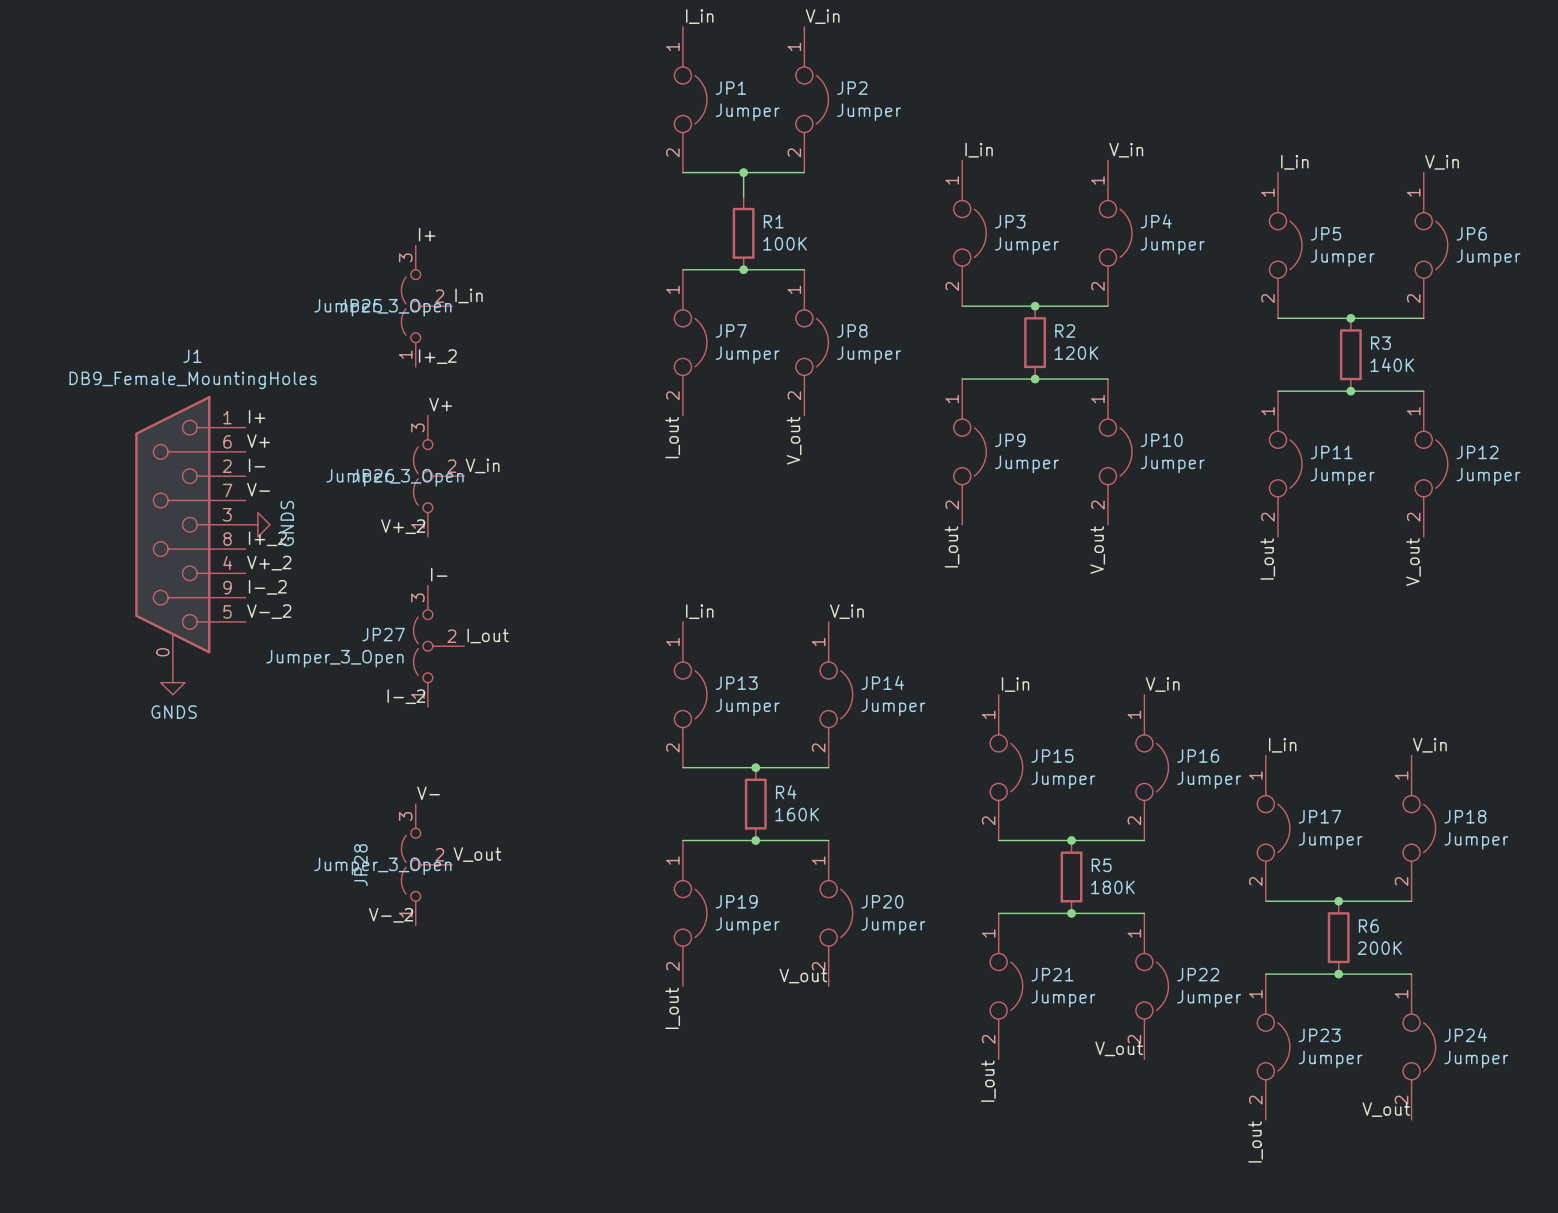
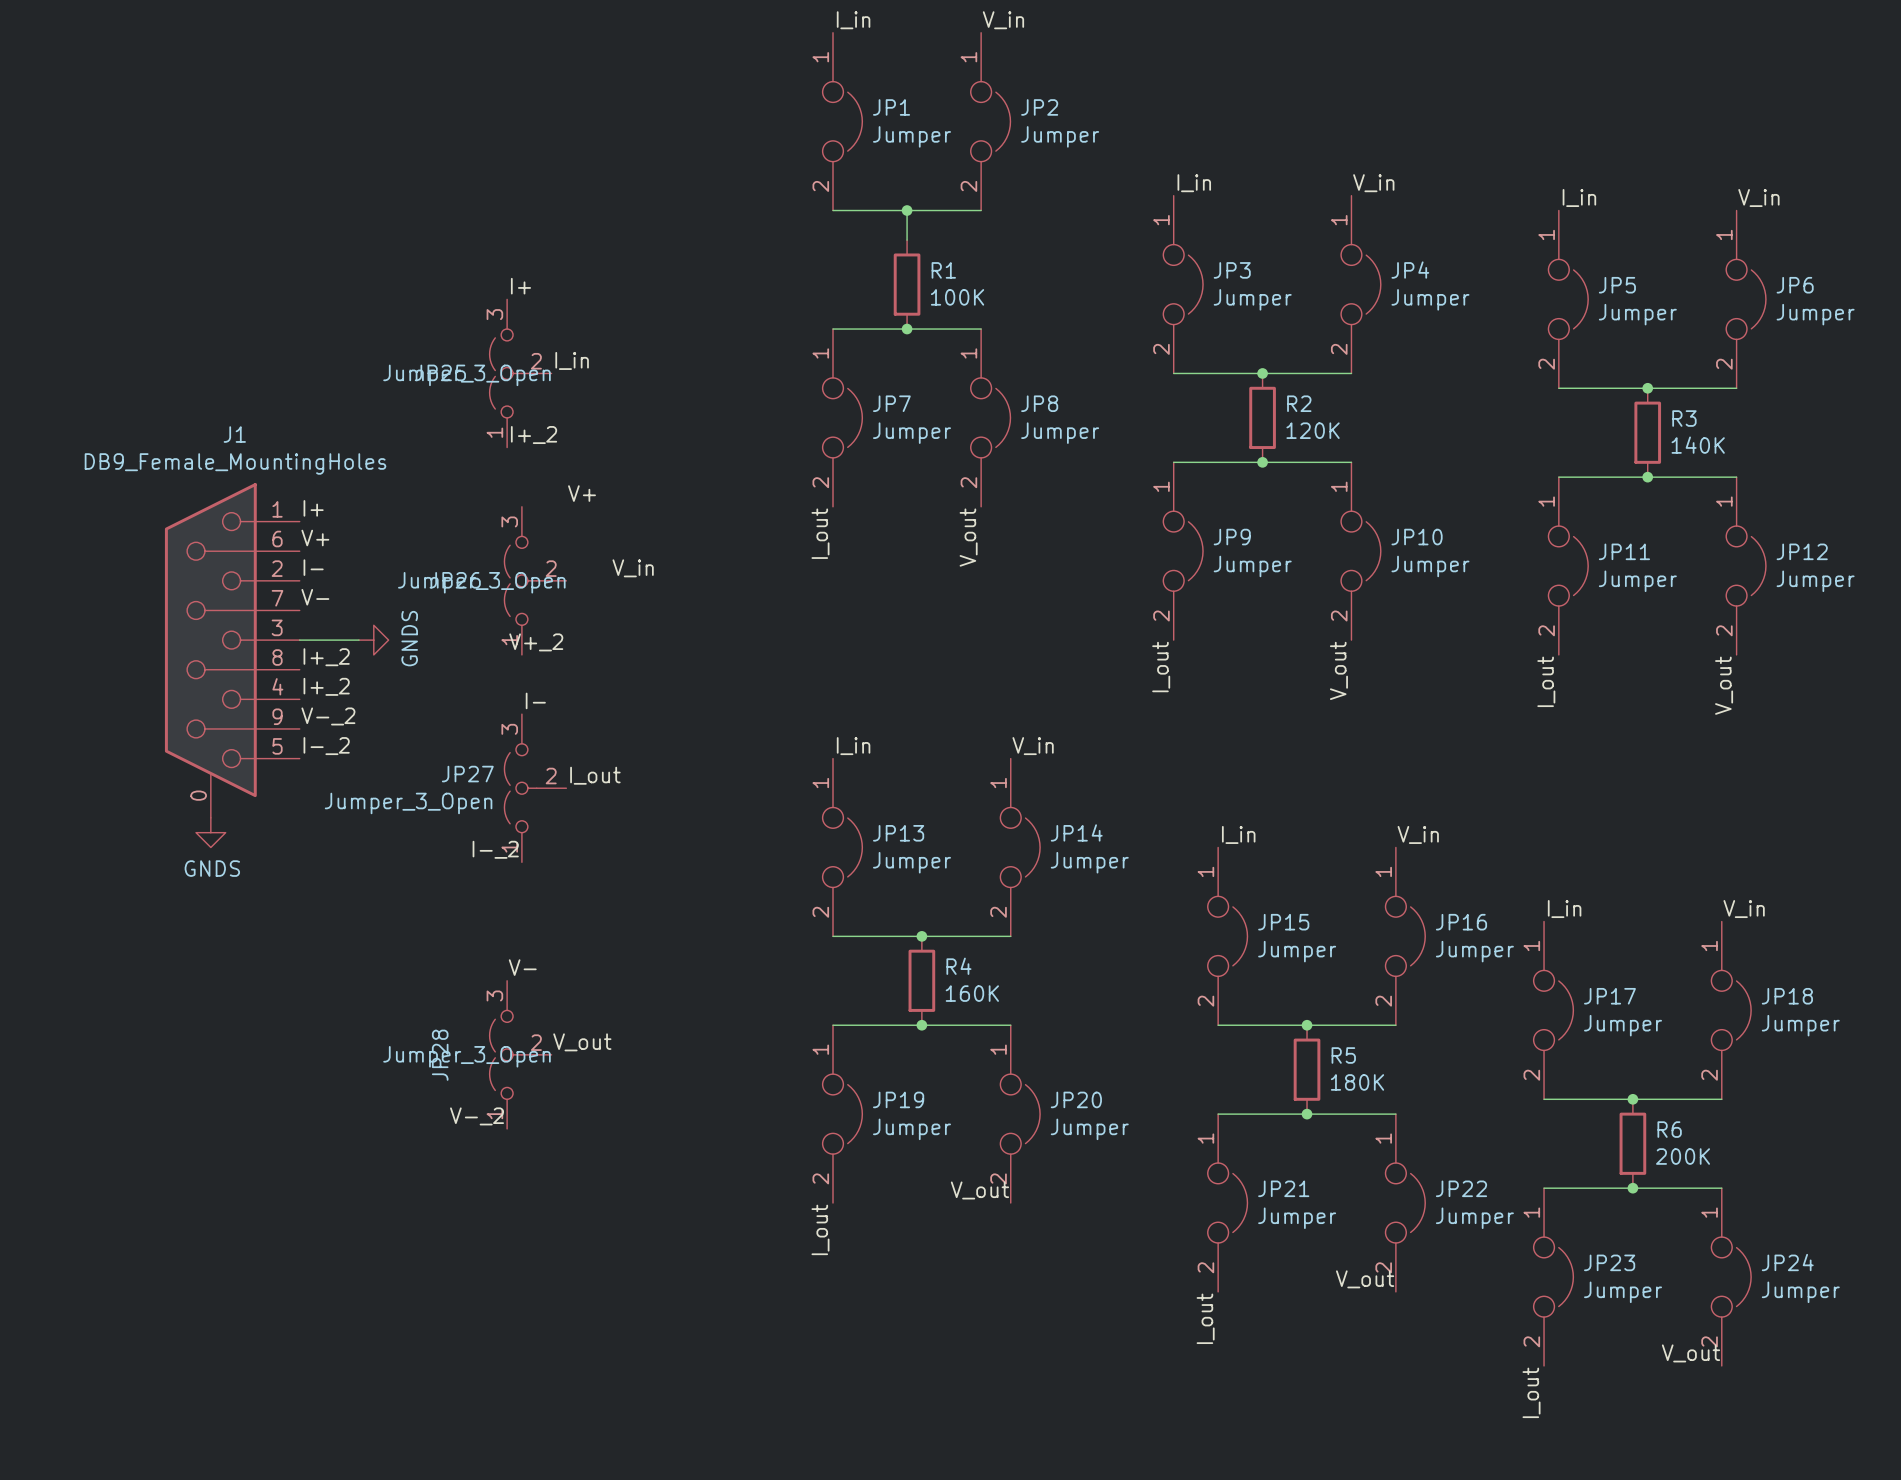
label position: V+ (440, 404) -> V+ (581, 493)
label position: V_in (482, 465) -> V_in (633, 568)
wire: none -> (299, 640) (358, 640)
power symbol position: GNDS (257, 524) -> GNDS (373, 640)
label position: V+_2 (403, 526) -> V+_2 (536, 642)
label: V+_2 (269, 563) -> I+_2 (326, 686)
label: I-_2 (267, 587) -> V-_2 (328, 716)
label: V-_2 (269, 611) -> I-_2 (326, 746)

